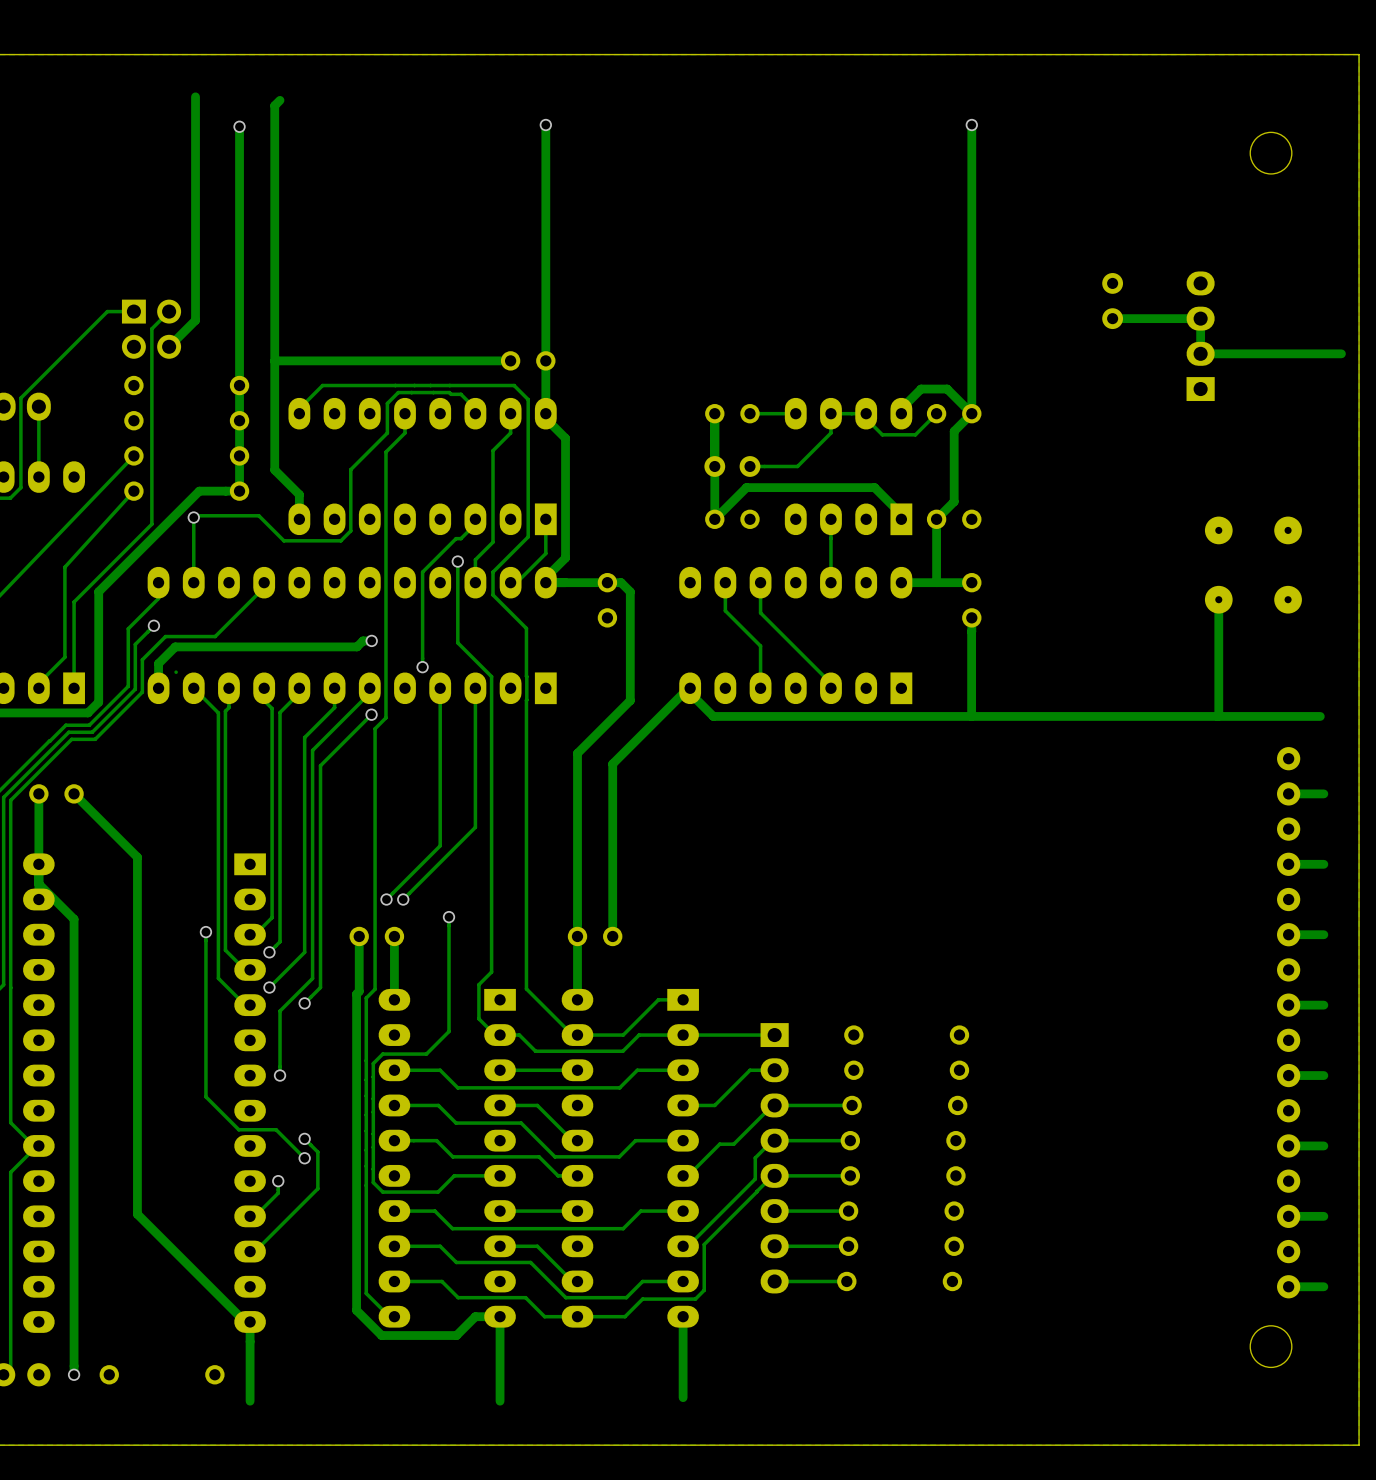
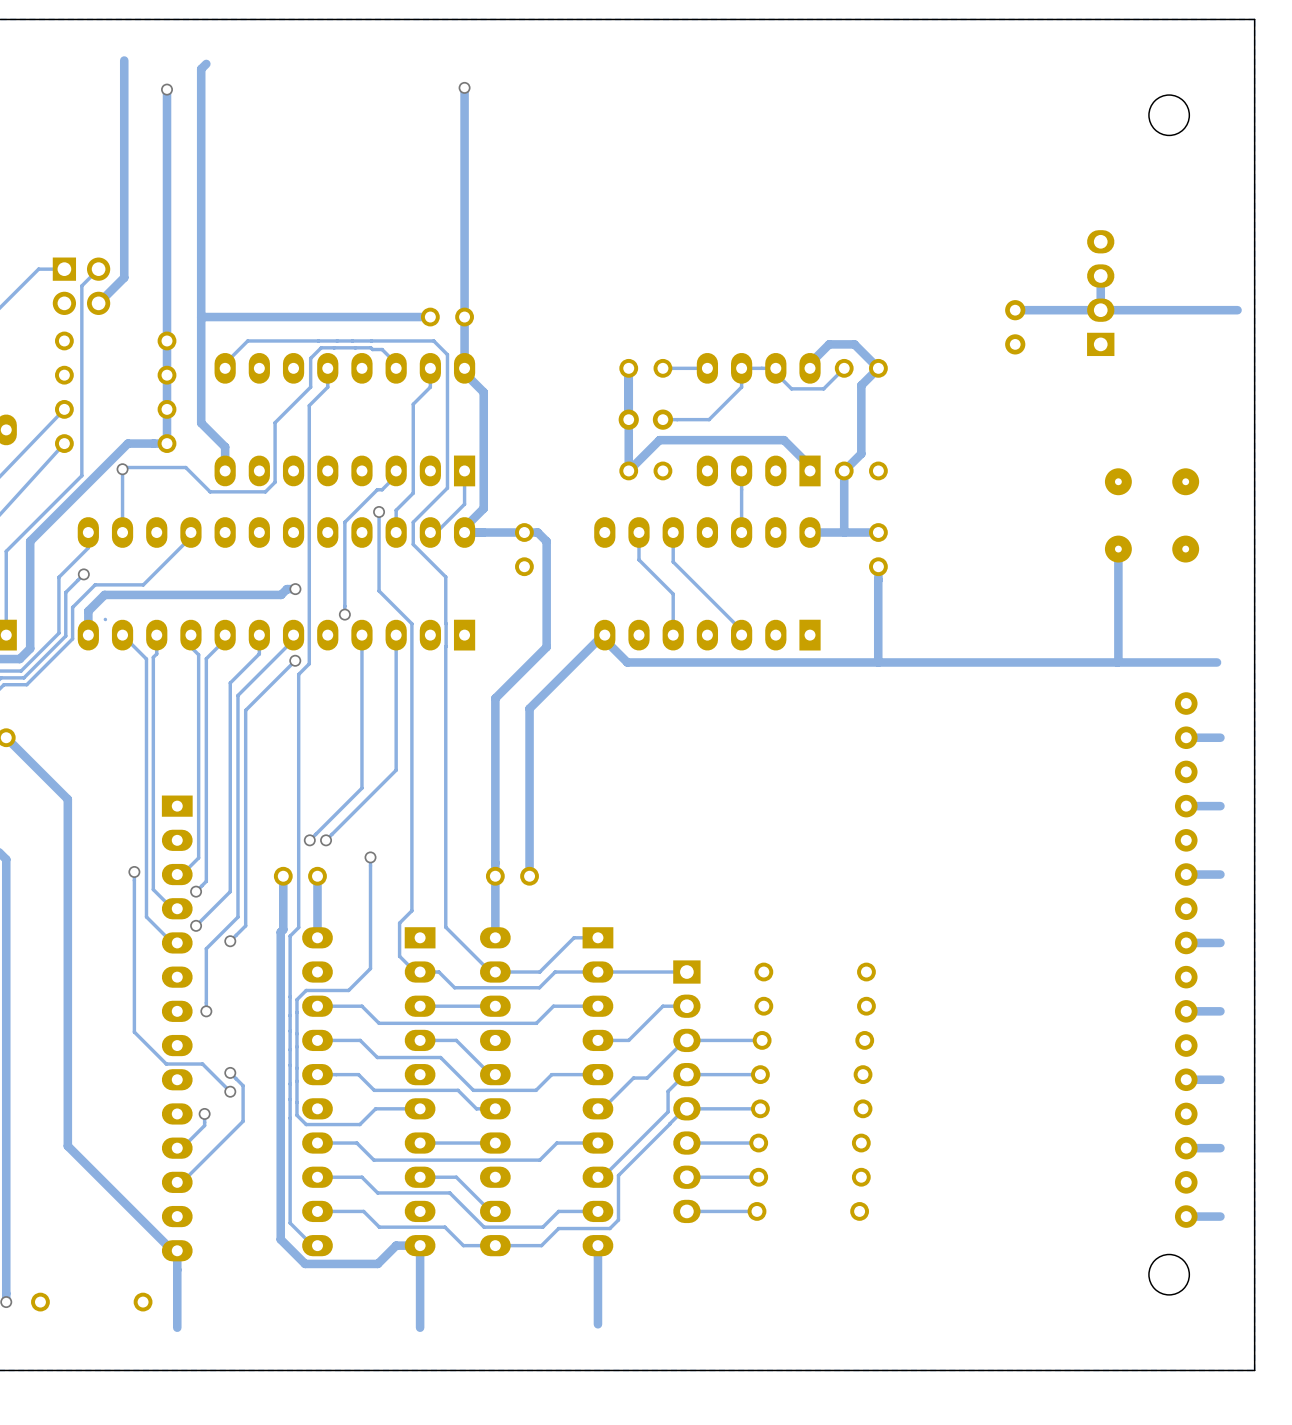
track: (971, 125) (971, 413) -> none
via: (971, 125) -> none
part position: (1112, 301) -> (1015, 327)
track: (1200, 318) (1112, 318) -> (1100, 310) (1015, 310)

